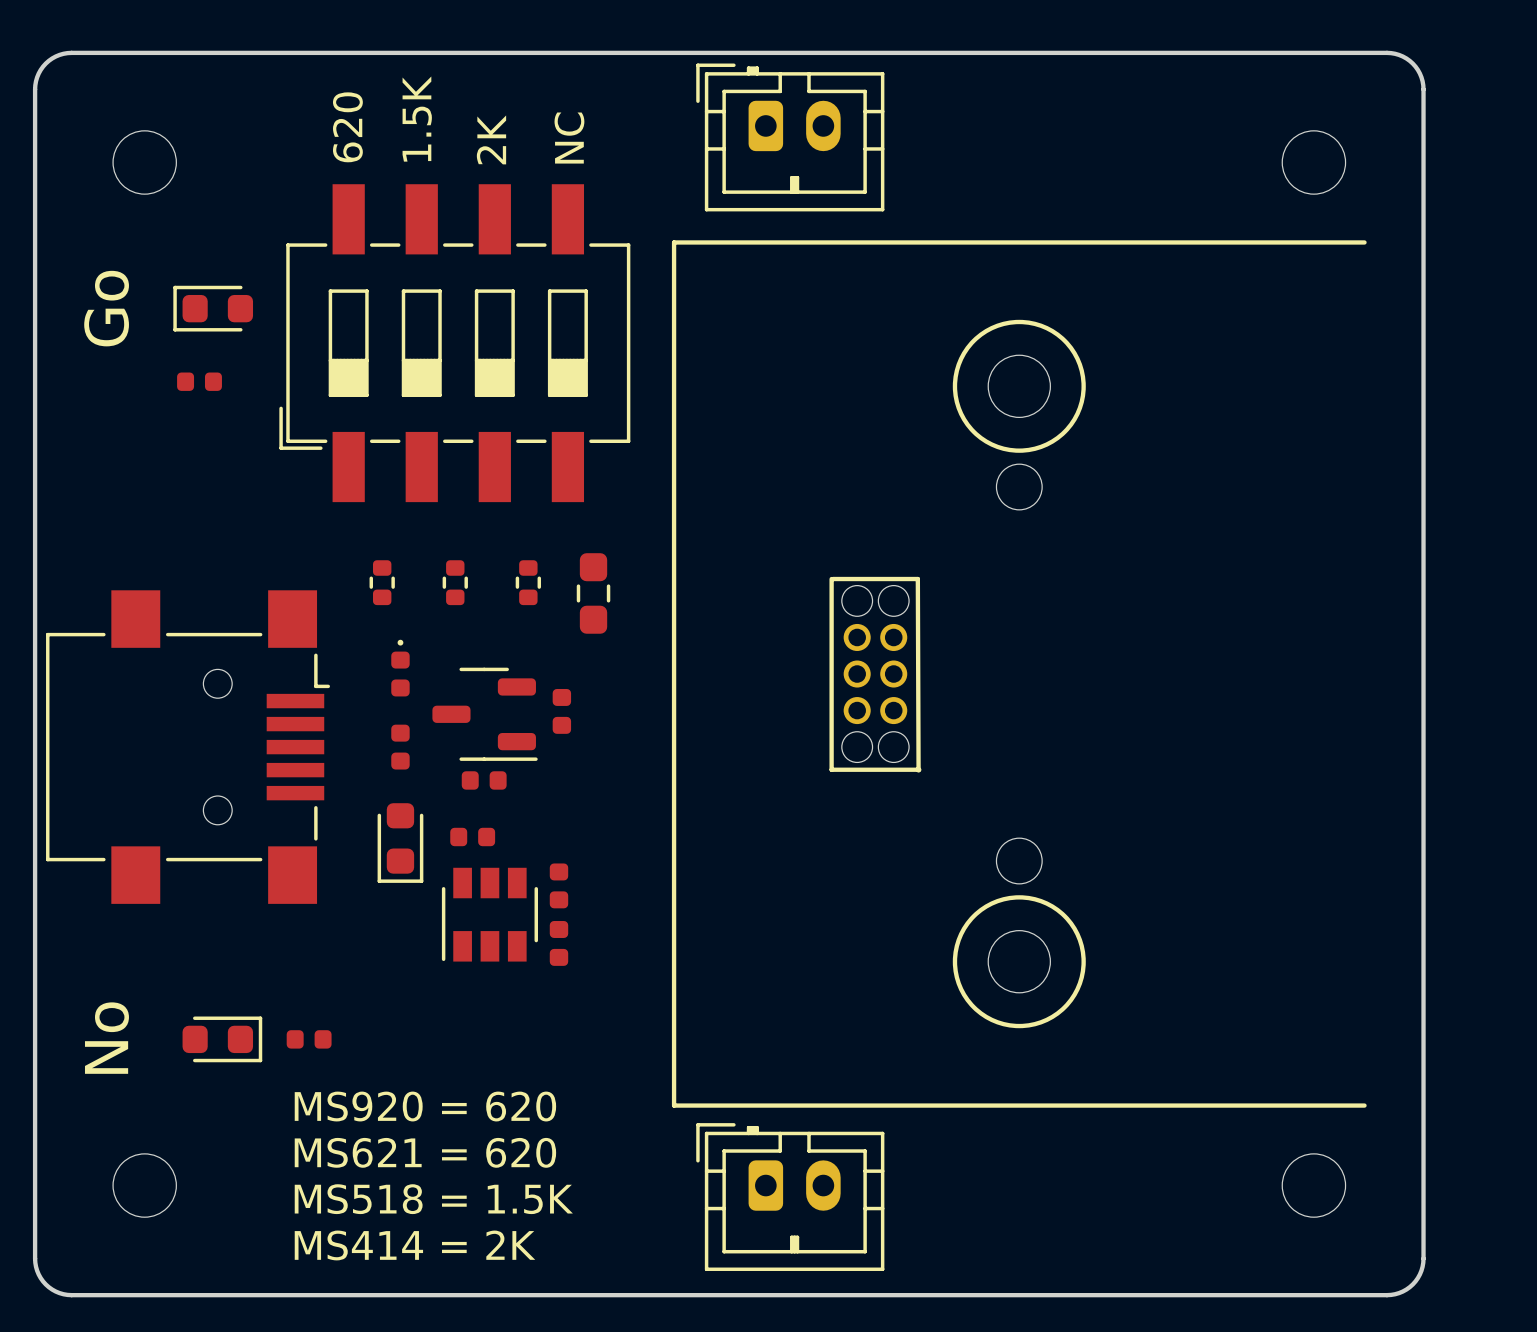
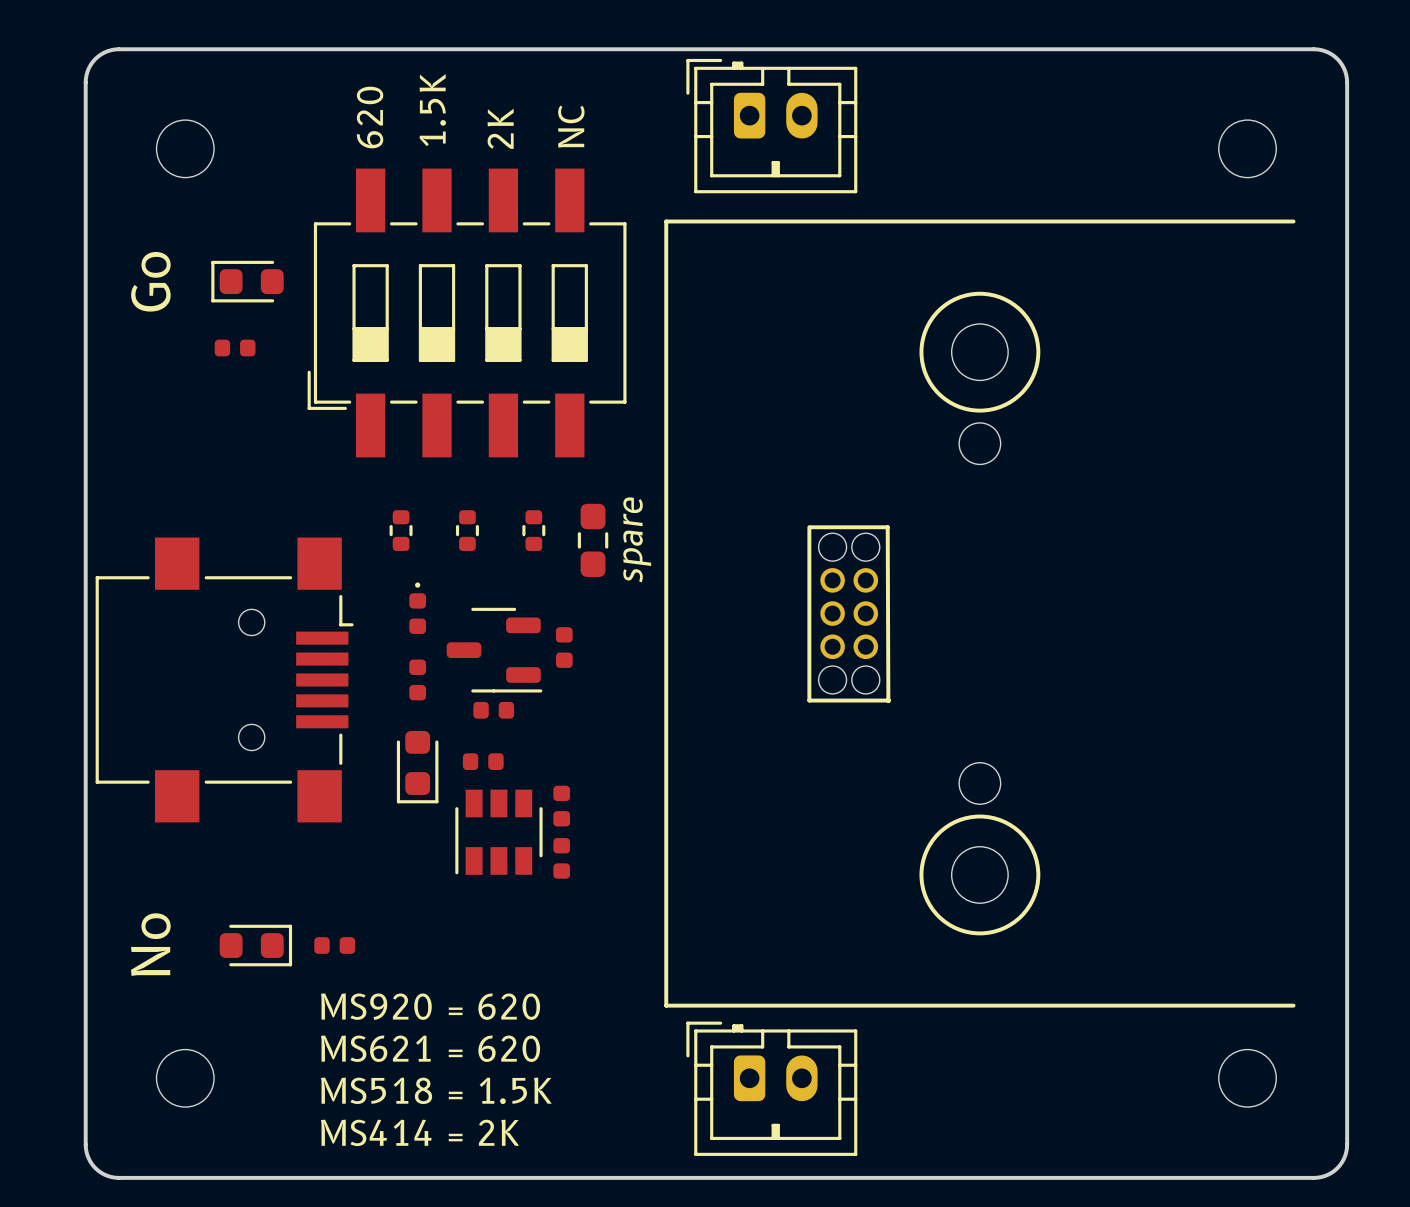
part value: none -> spare (637, 539)

